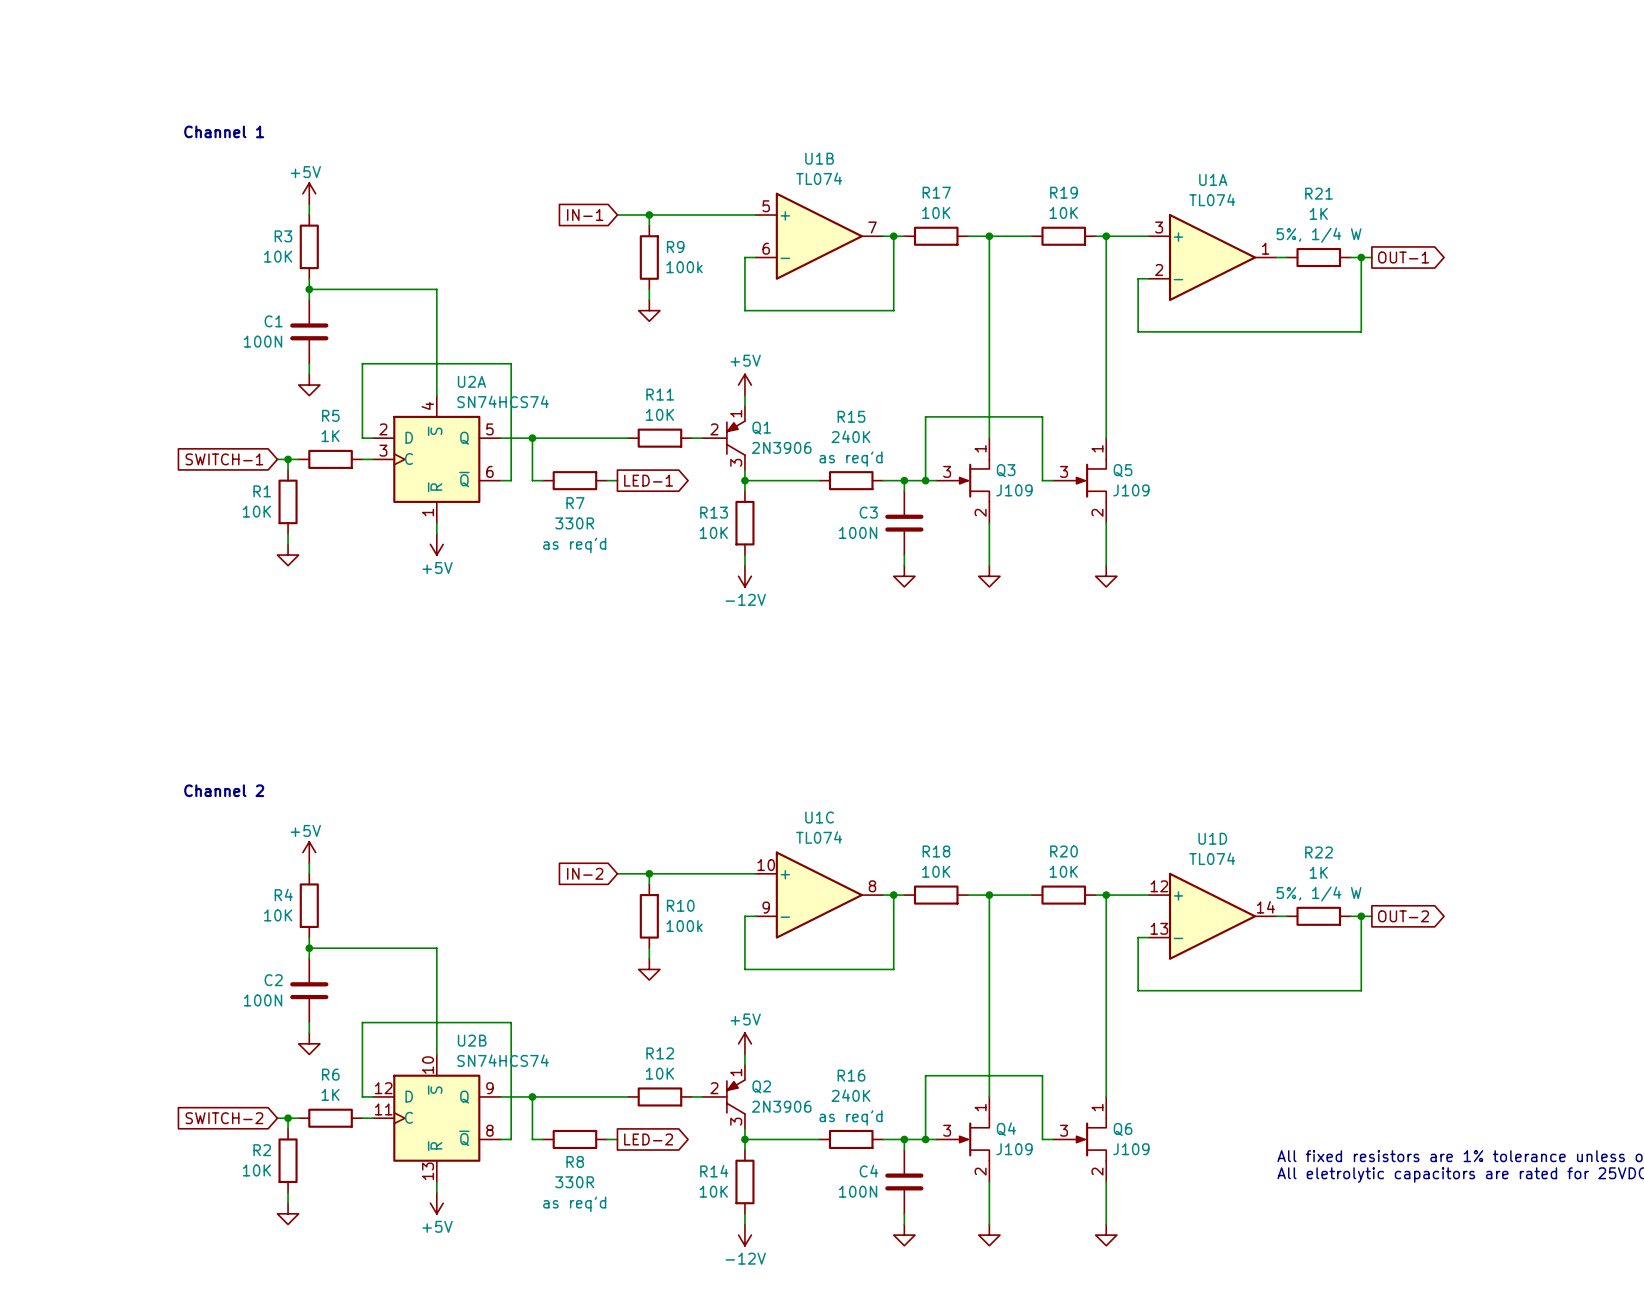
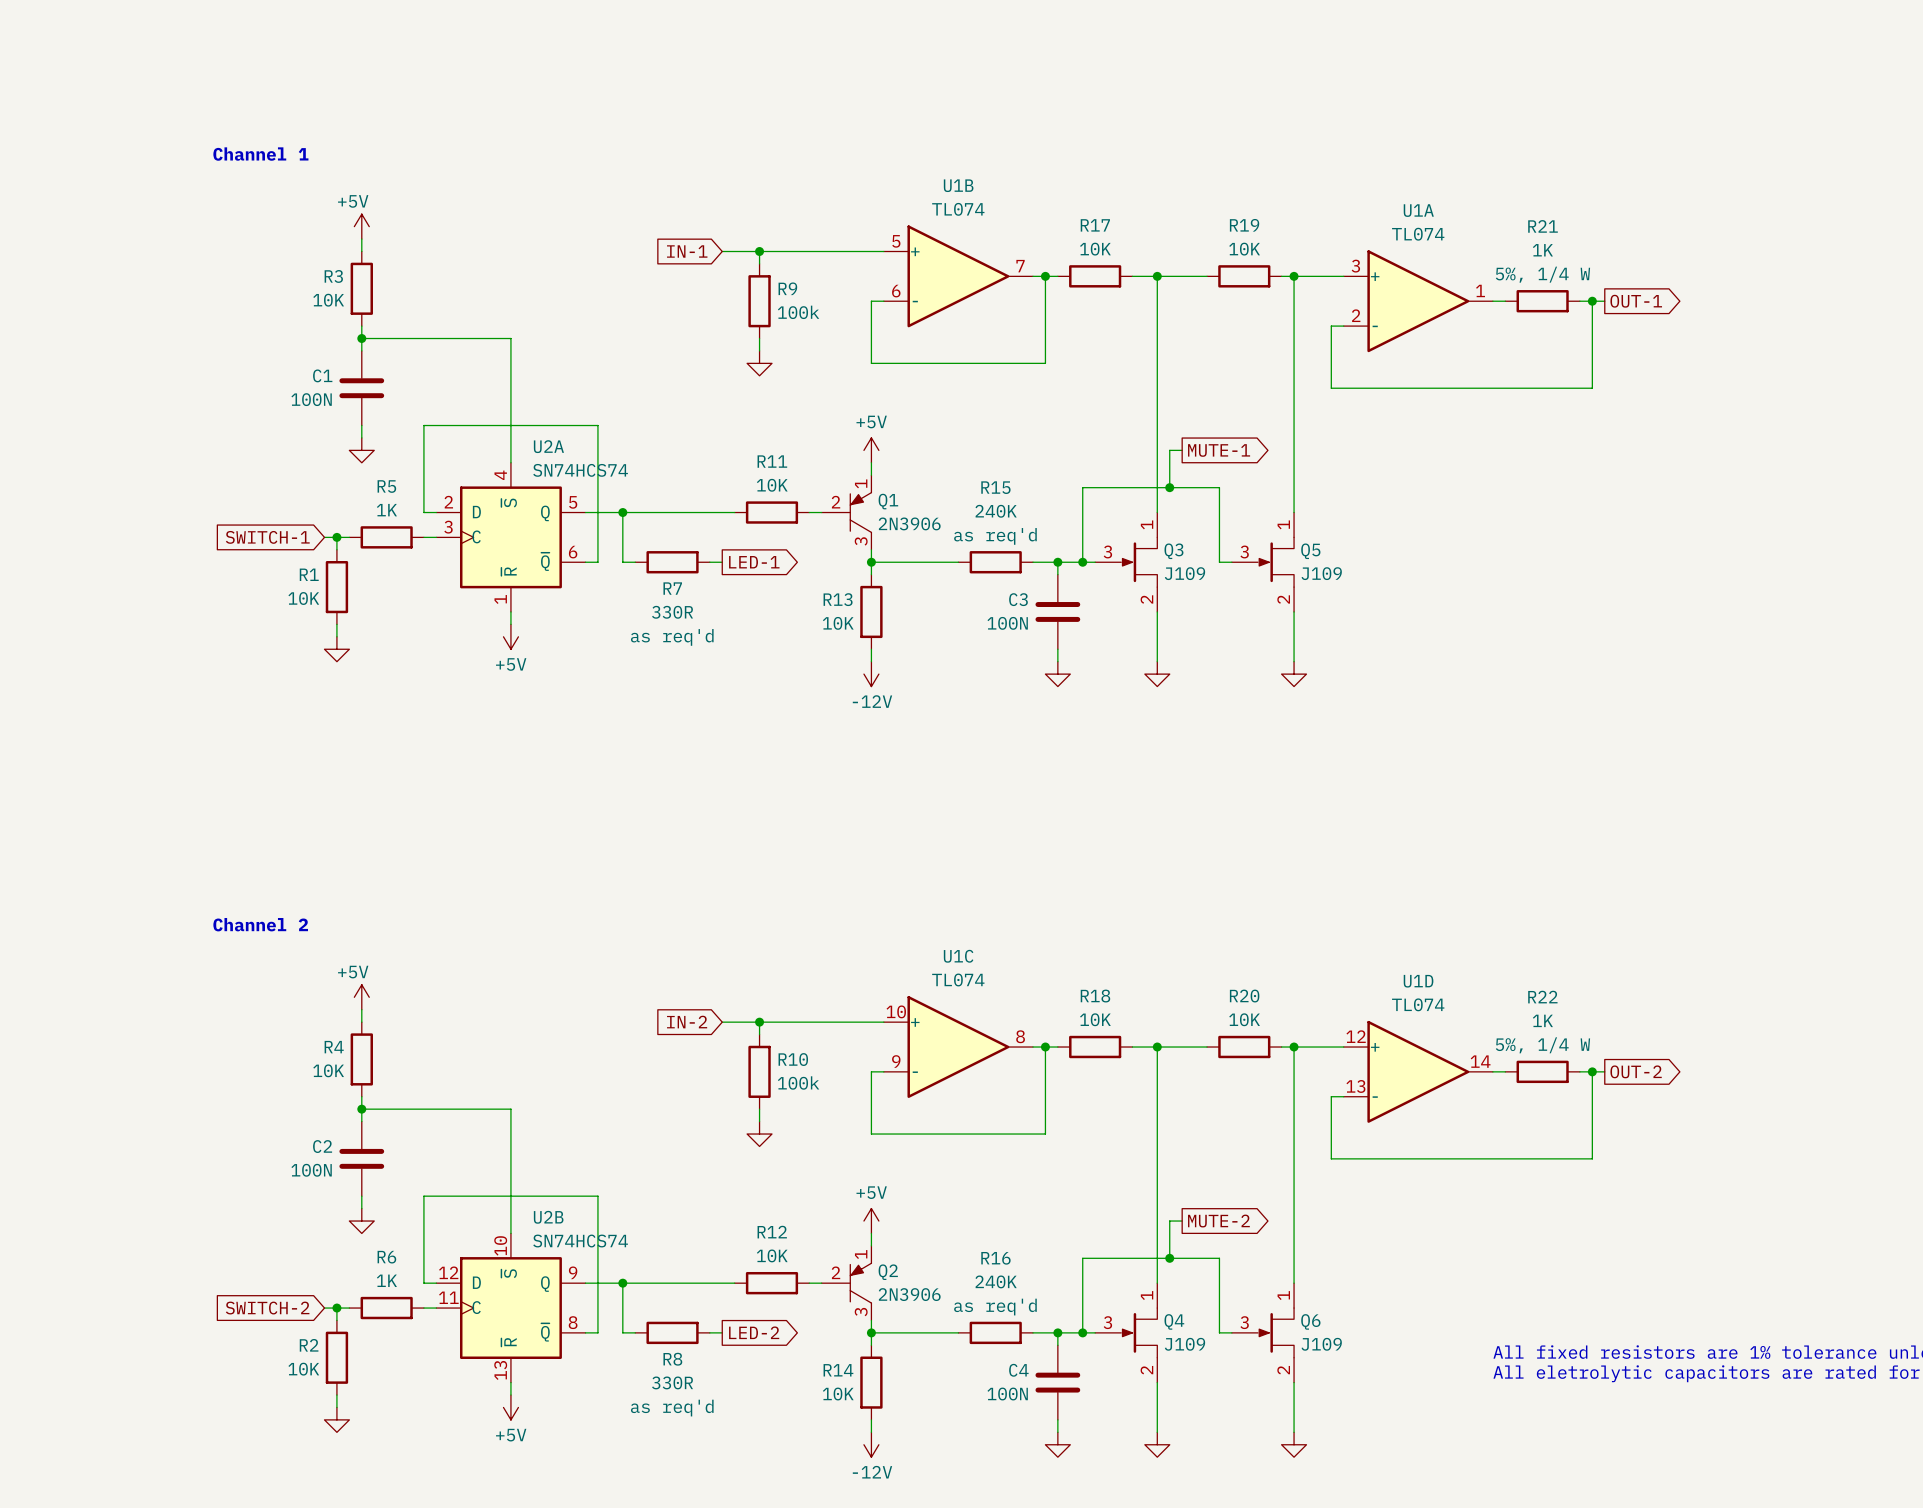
wire: none -> (1182, 450) (1169, 450) (1169, 487)
global label: none -> MUTE-1 (1219, 450)
junction: none -> (1169, 487)
wire: none -> (1182, 1221) (1169, 1221) (1169, 1258)
global label: none -> MUTE-2 (1218, 1221)
junction: none -> (1169, 1258)

